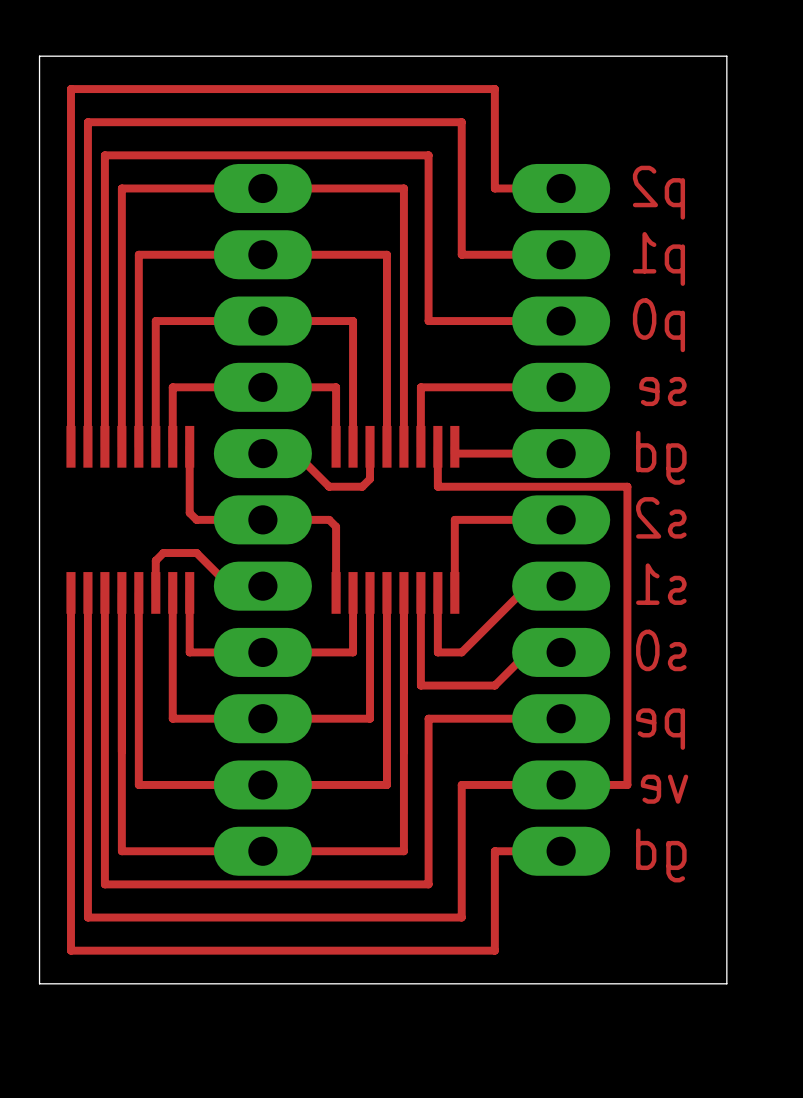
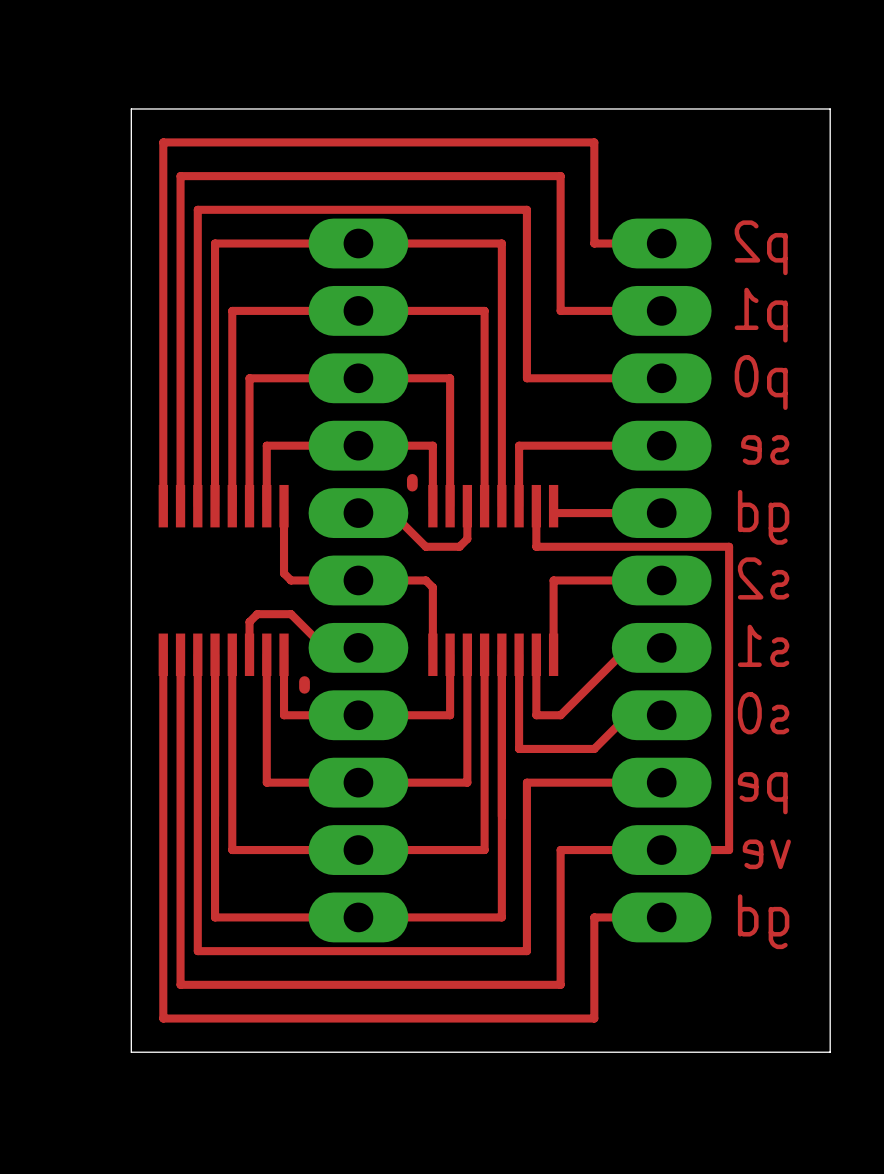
top track: none -> (412, 479) (412, 486)
top track: none -> (304, 681) (304, 688)

